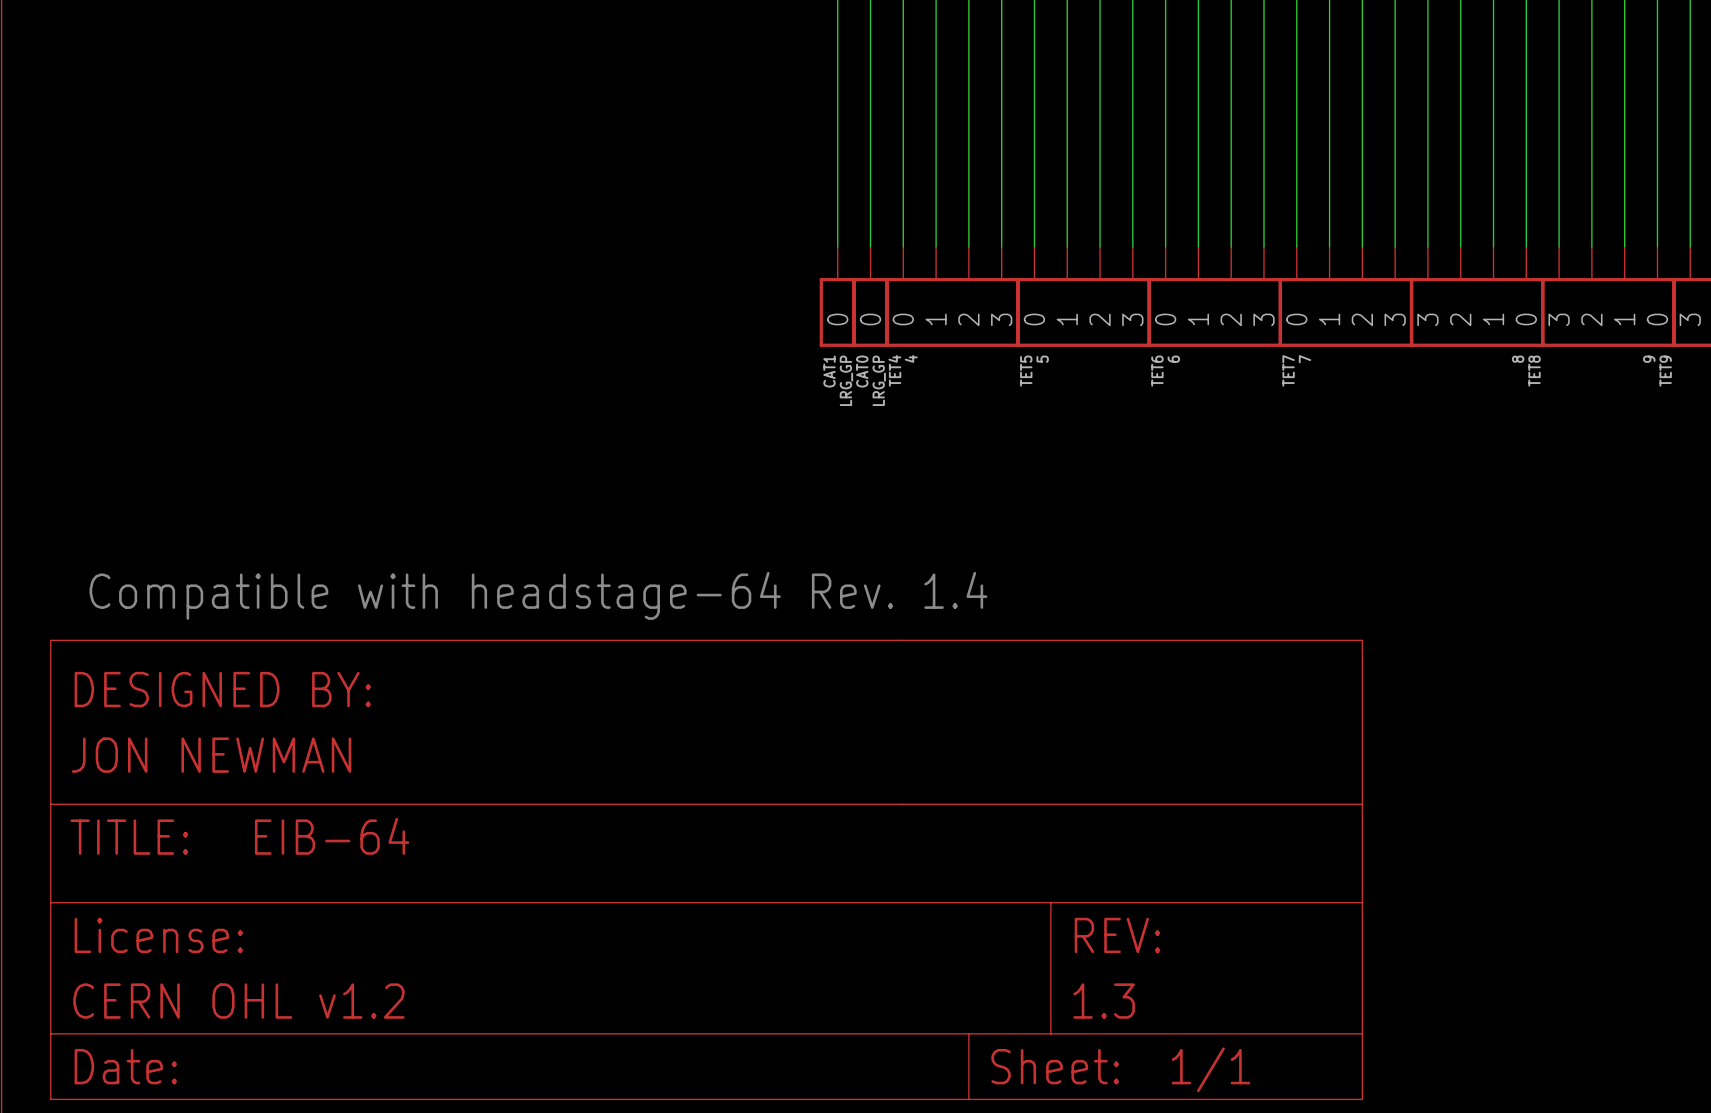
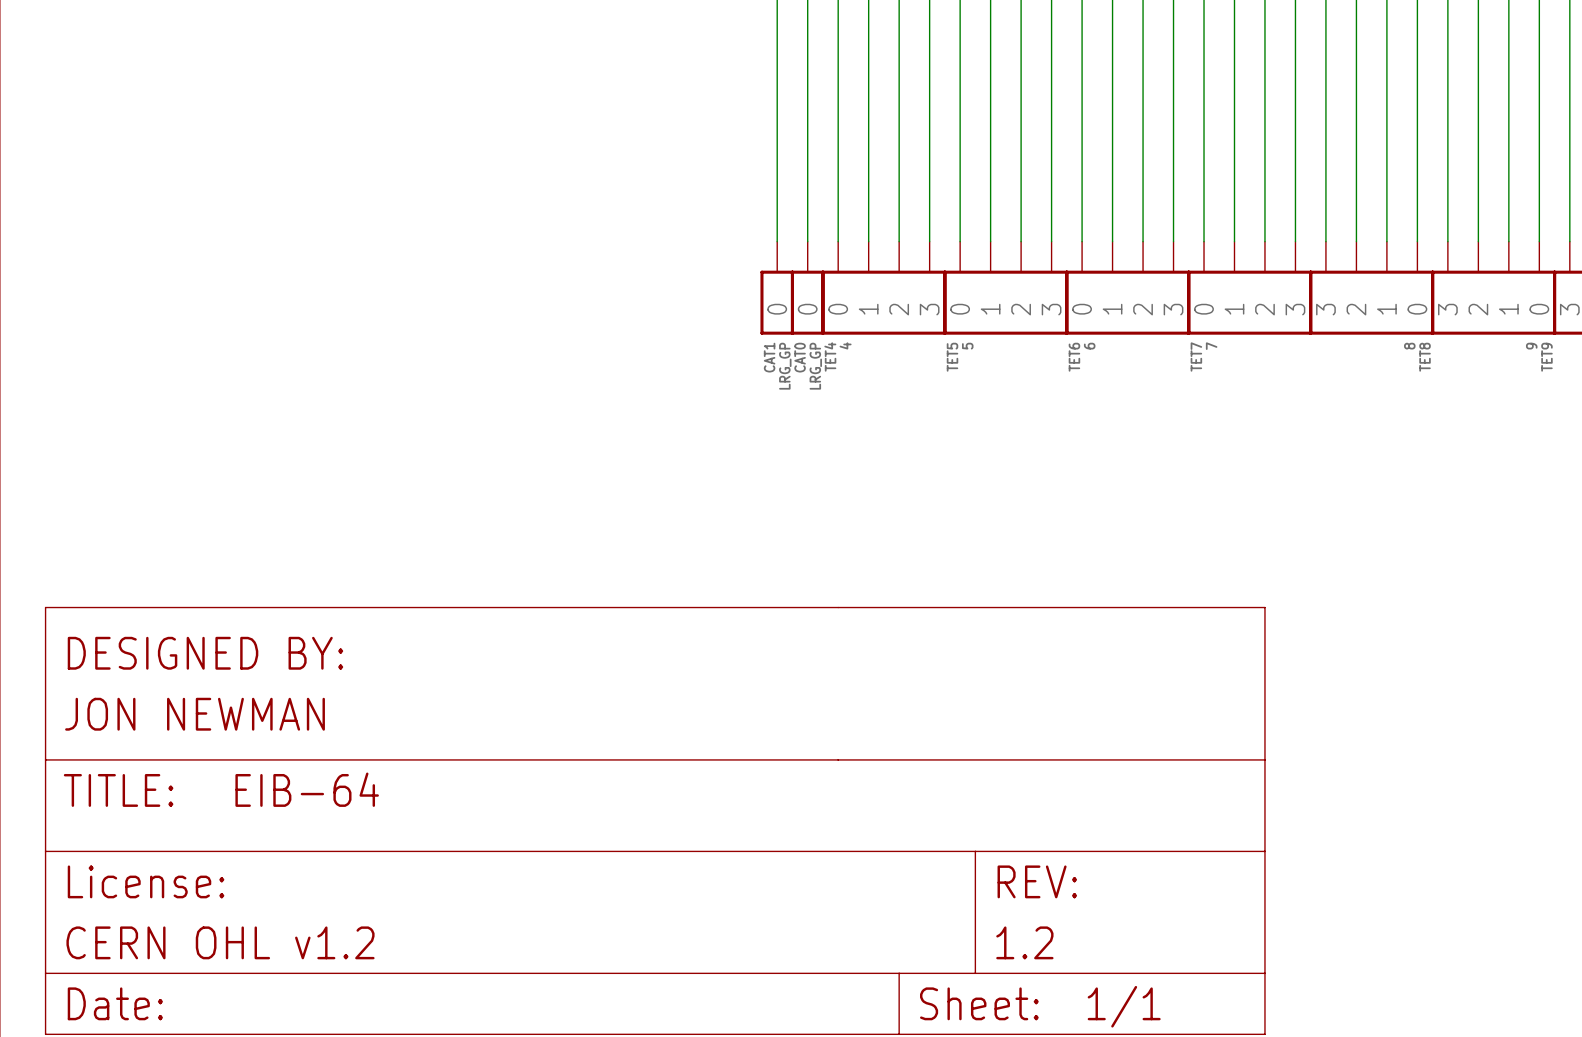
text: Compatible with headstage-64 Rev. 1.4 (538, 595) -> none
part text: 1.3 (1104, 1001) -> 1.2 (1024, 942)

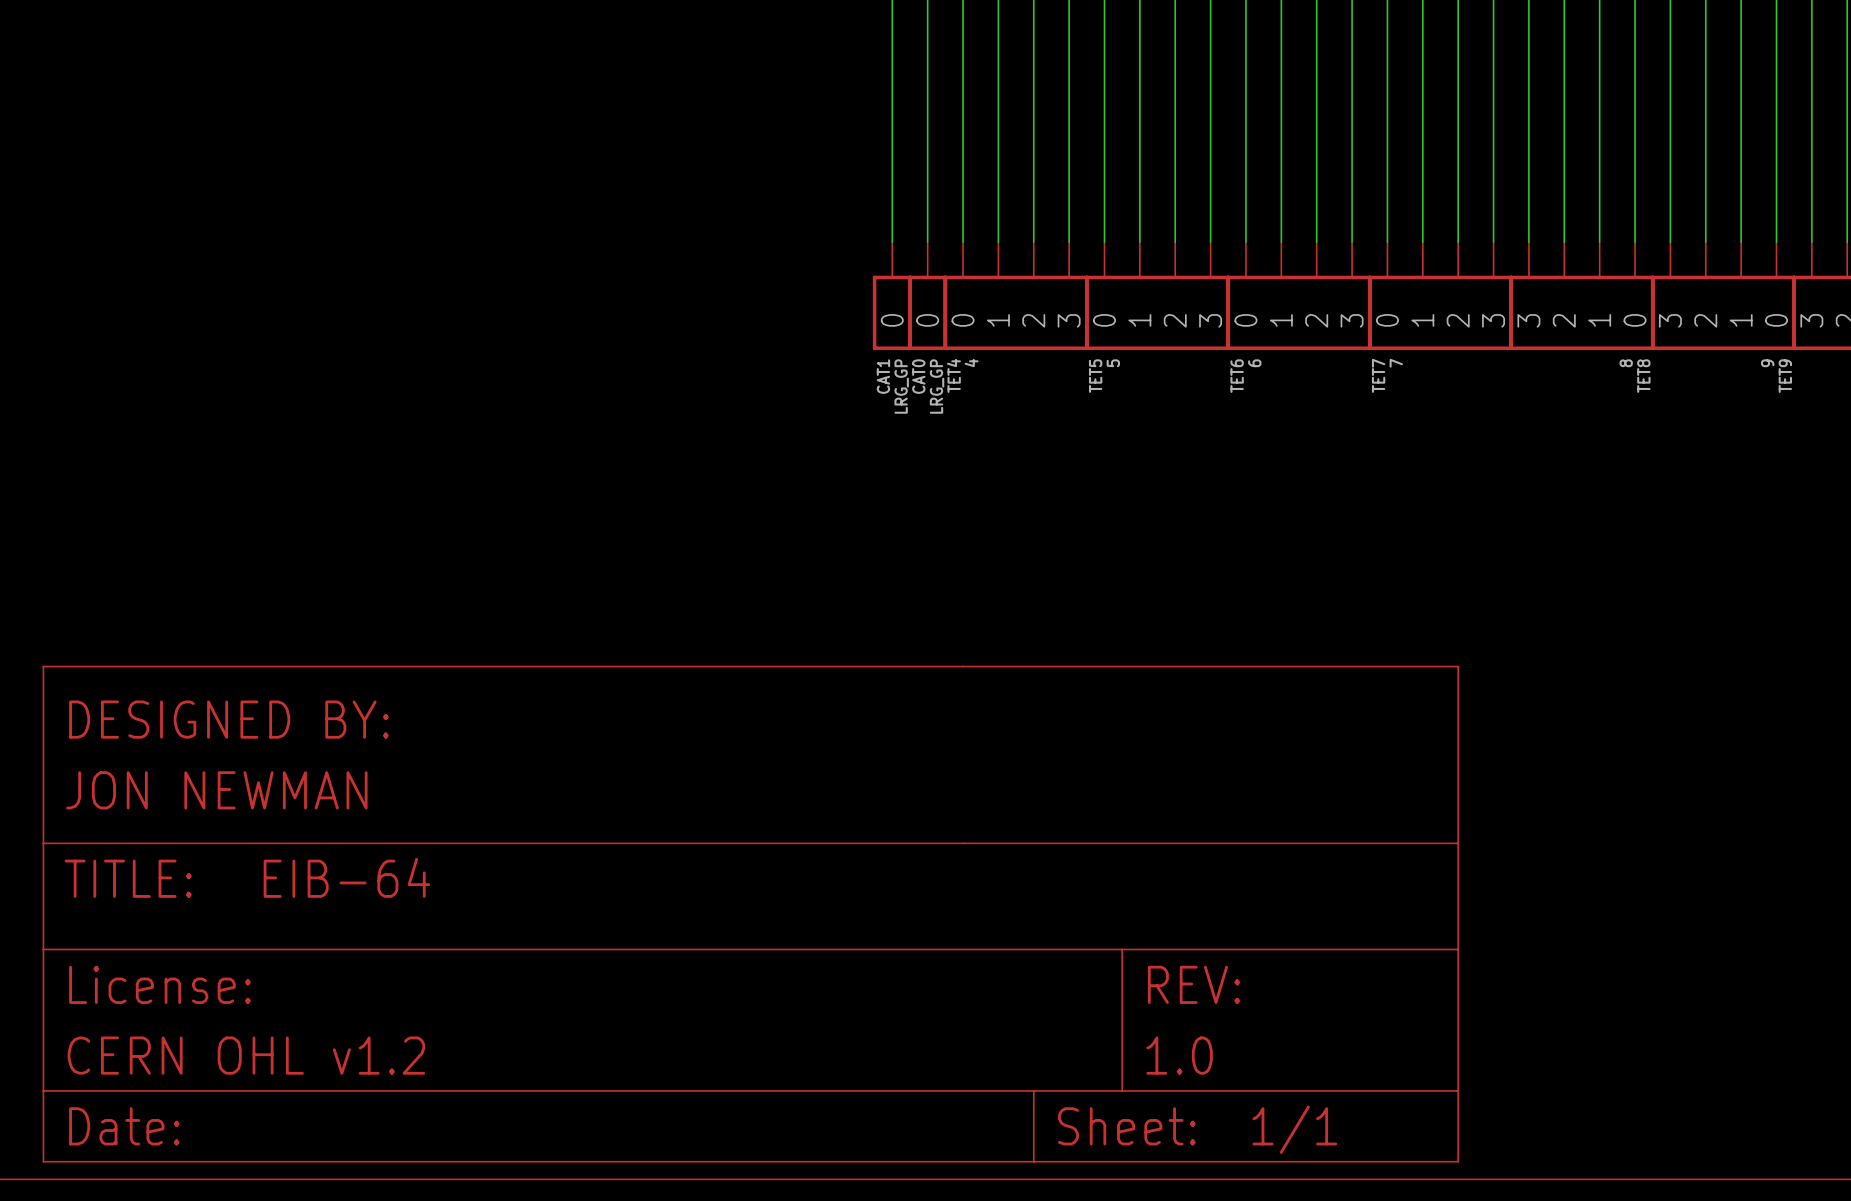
part text: 1.2 (1024, 942) -> 1.0 (1179, 1055)

